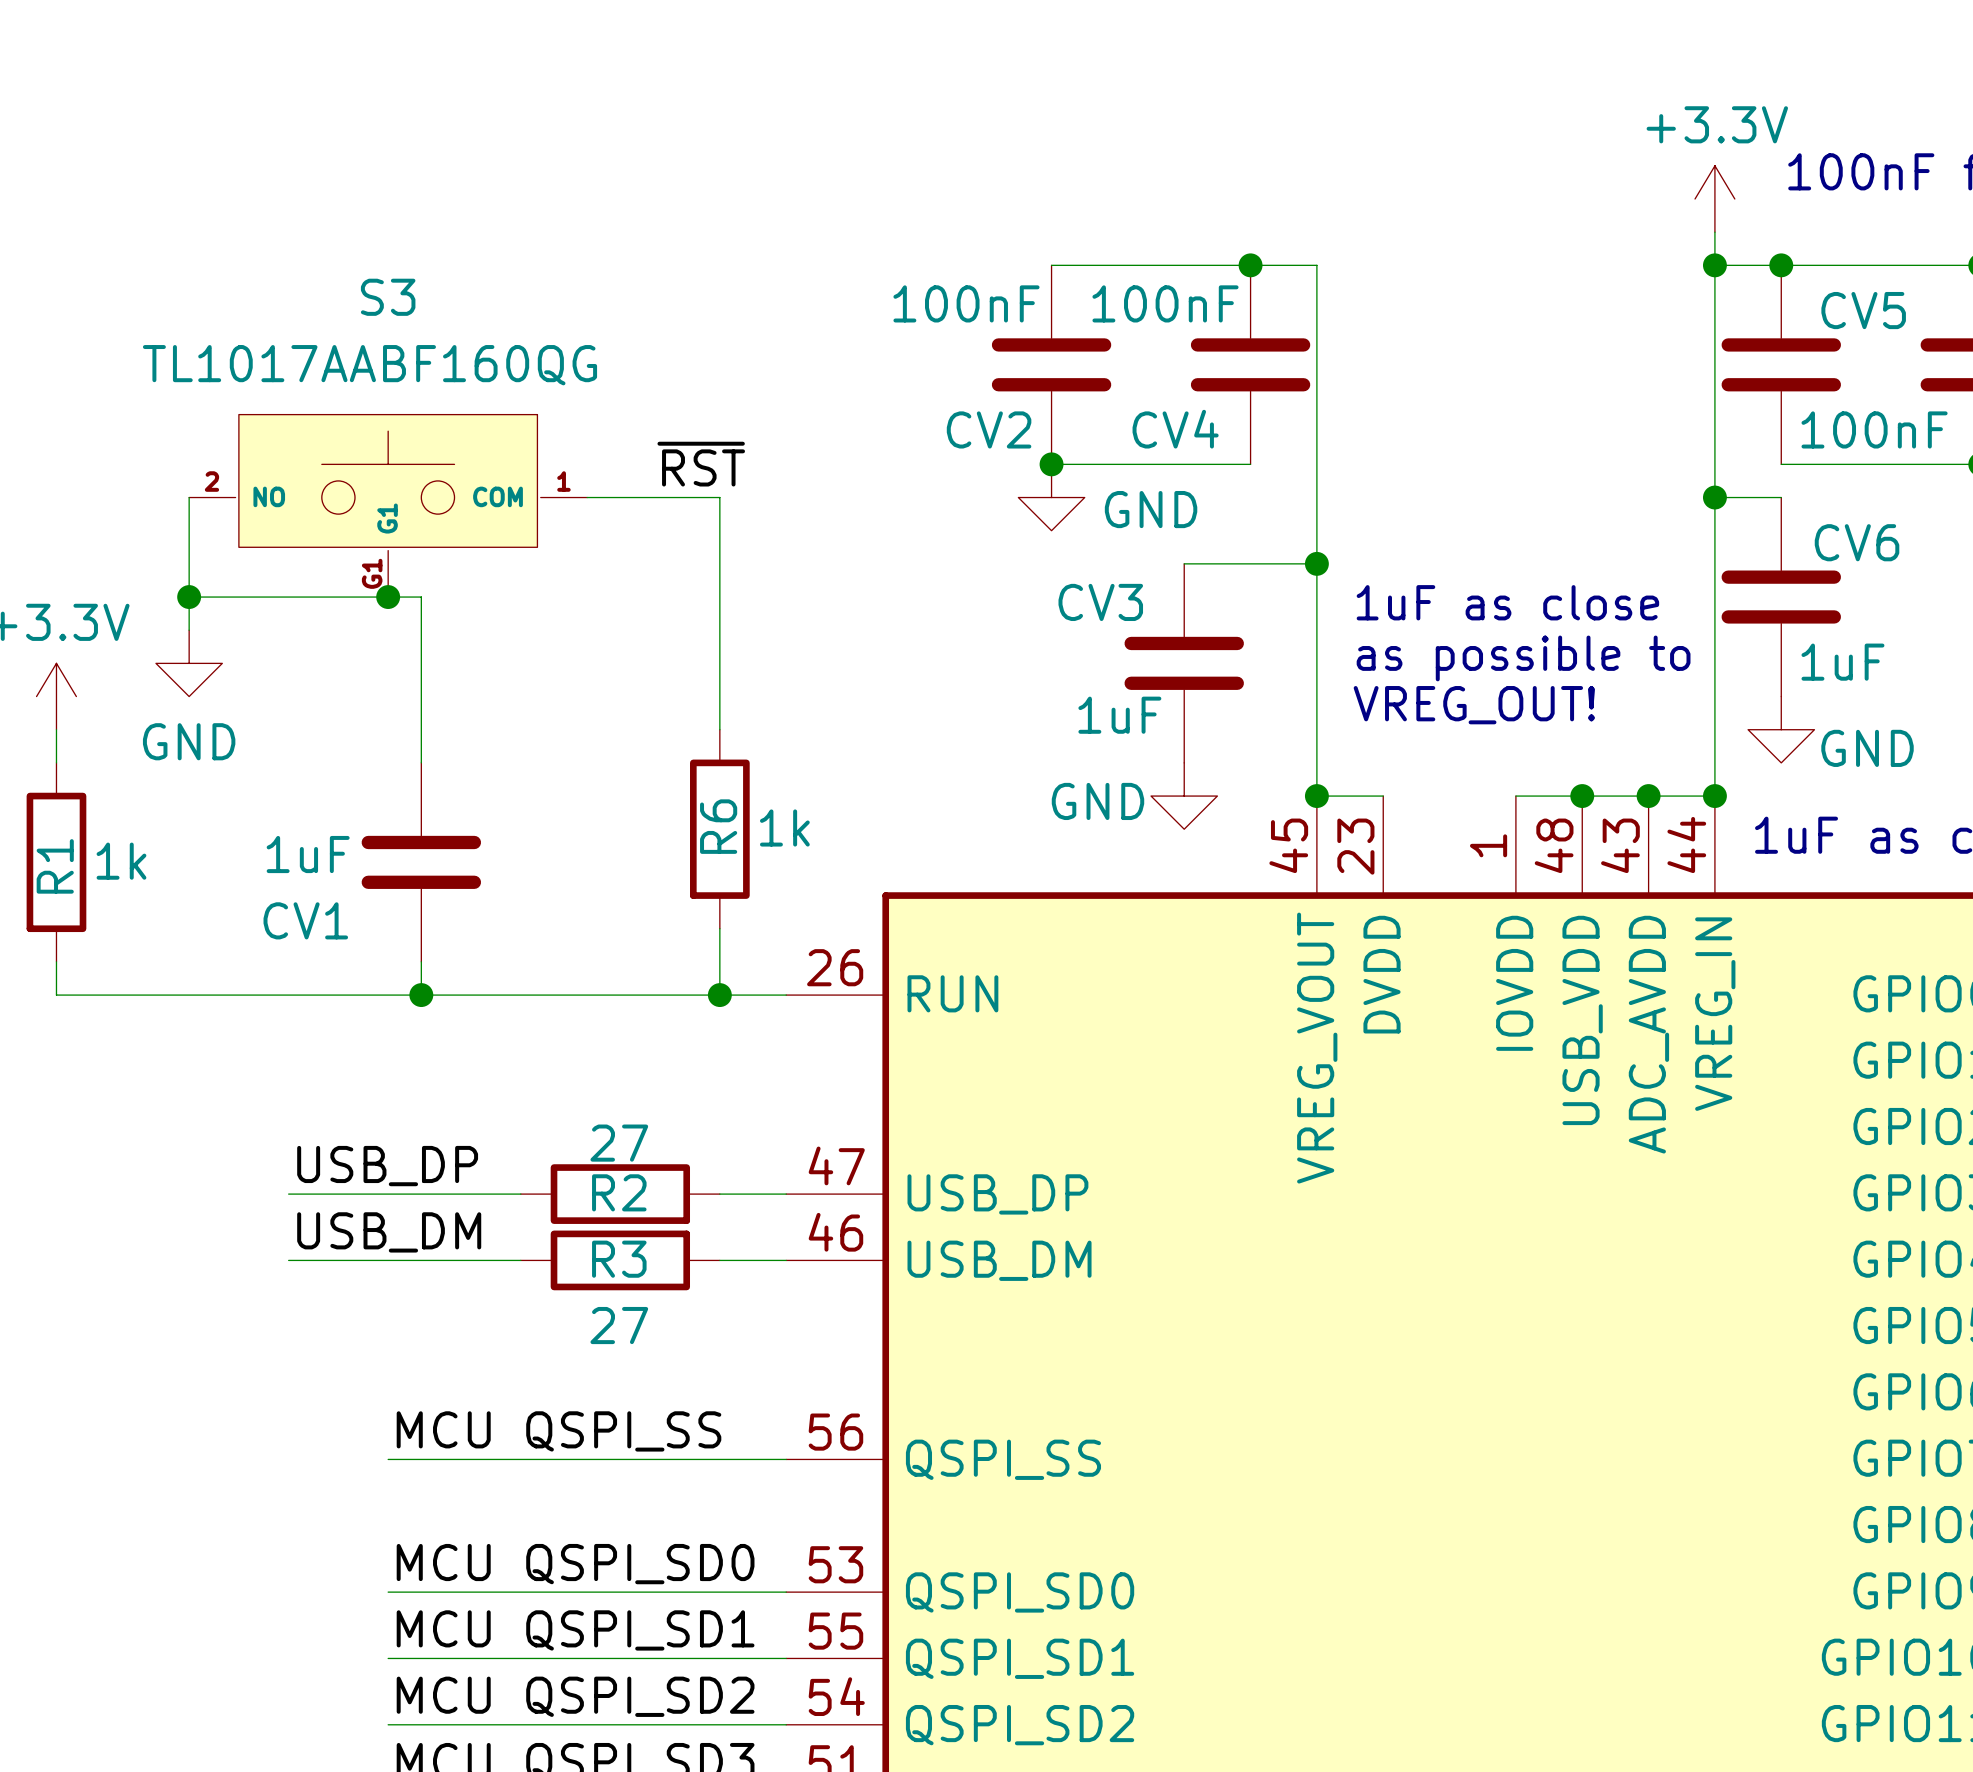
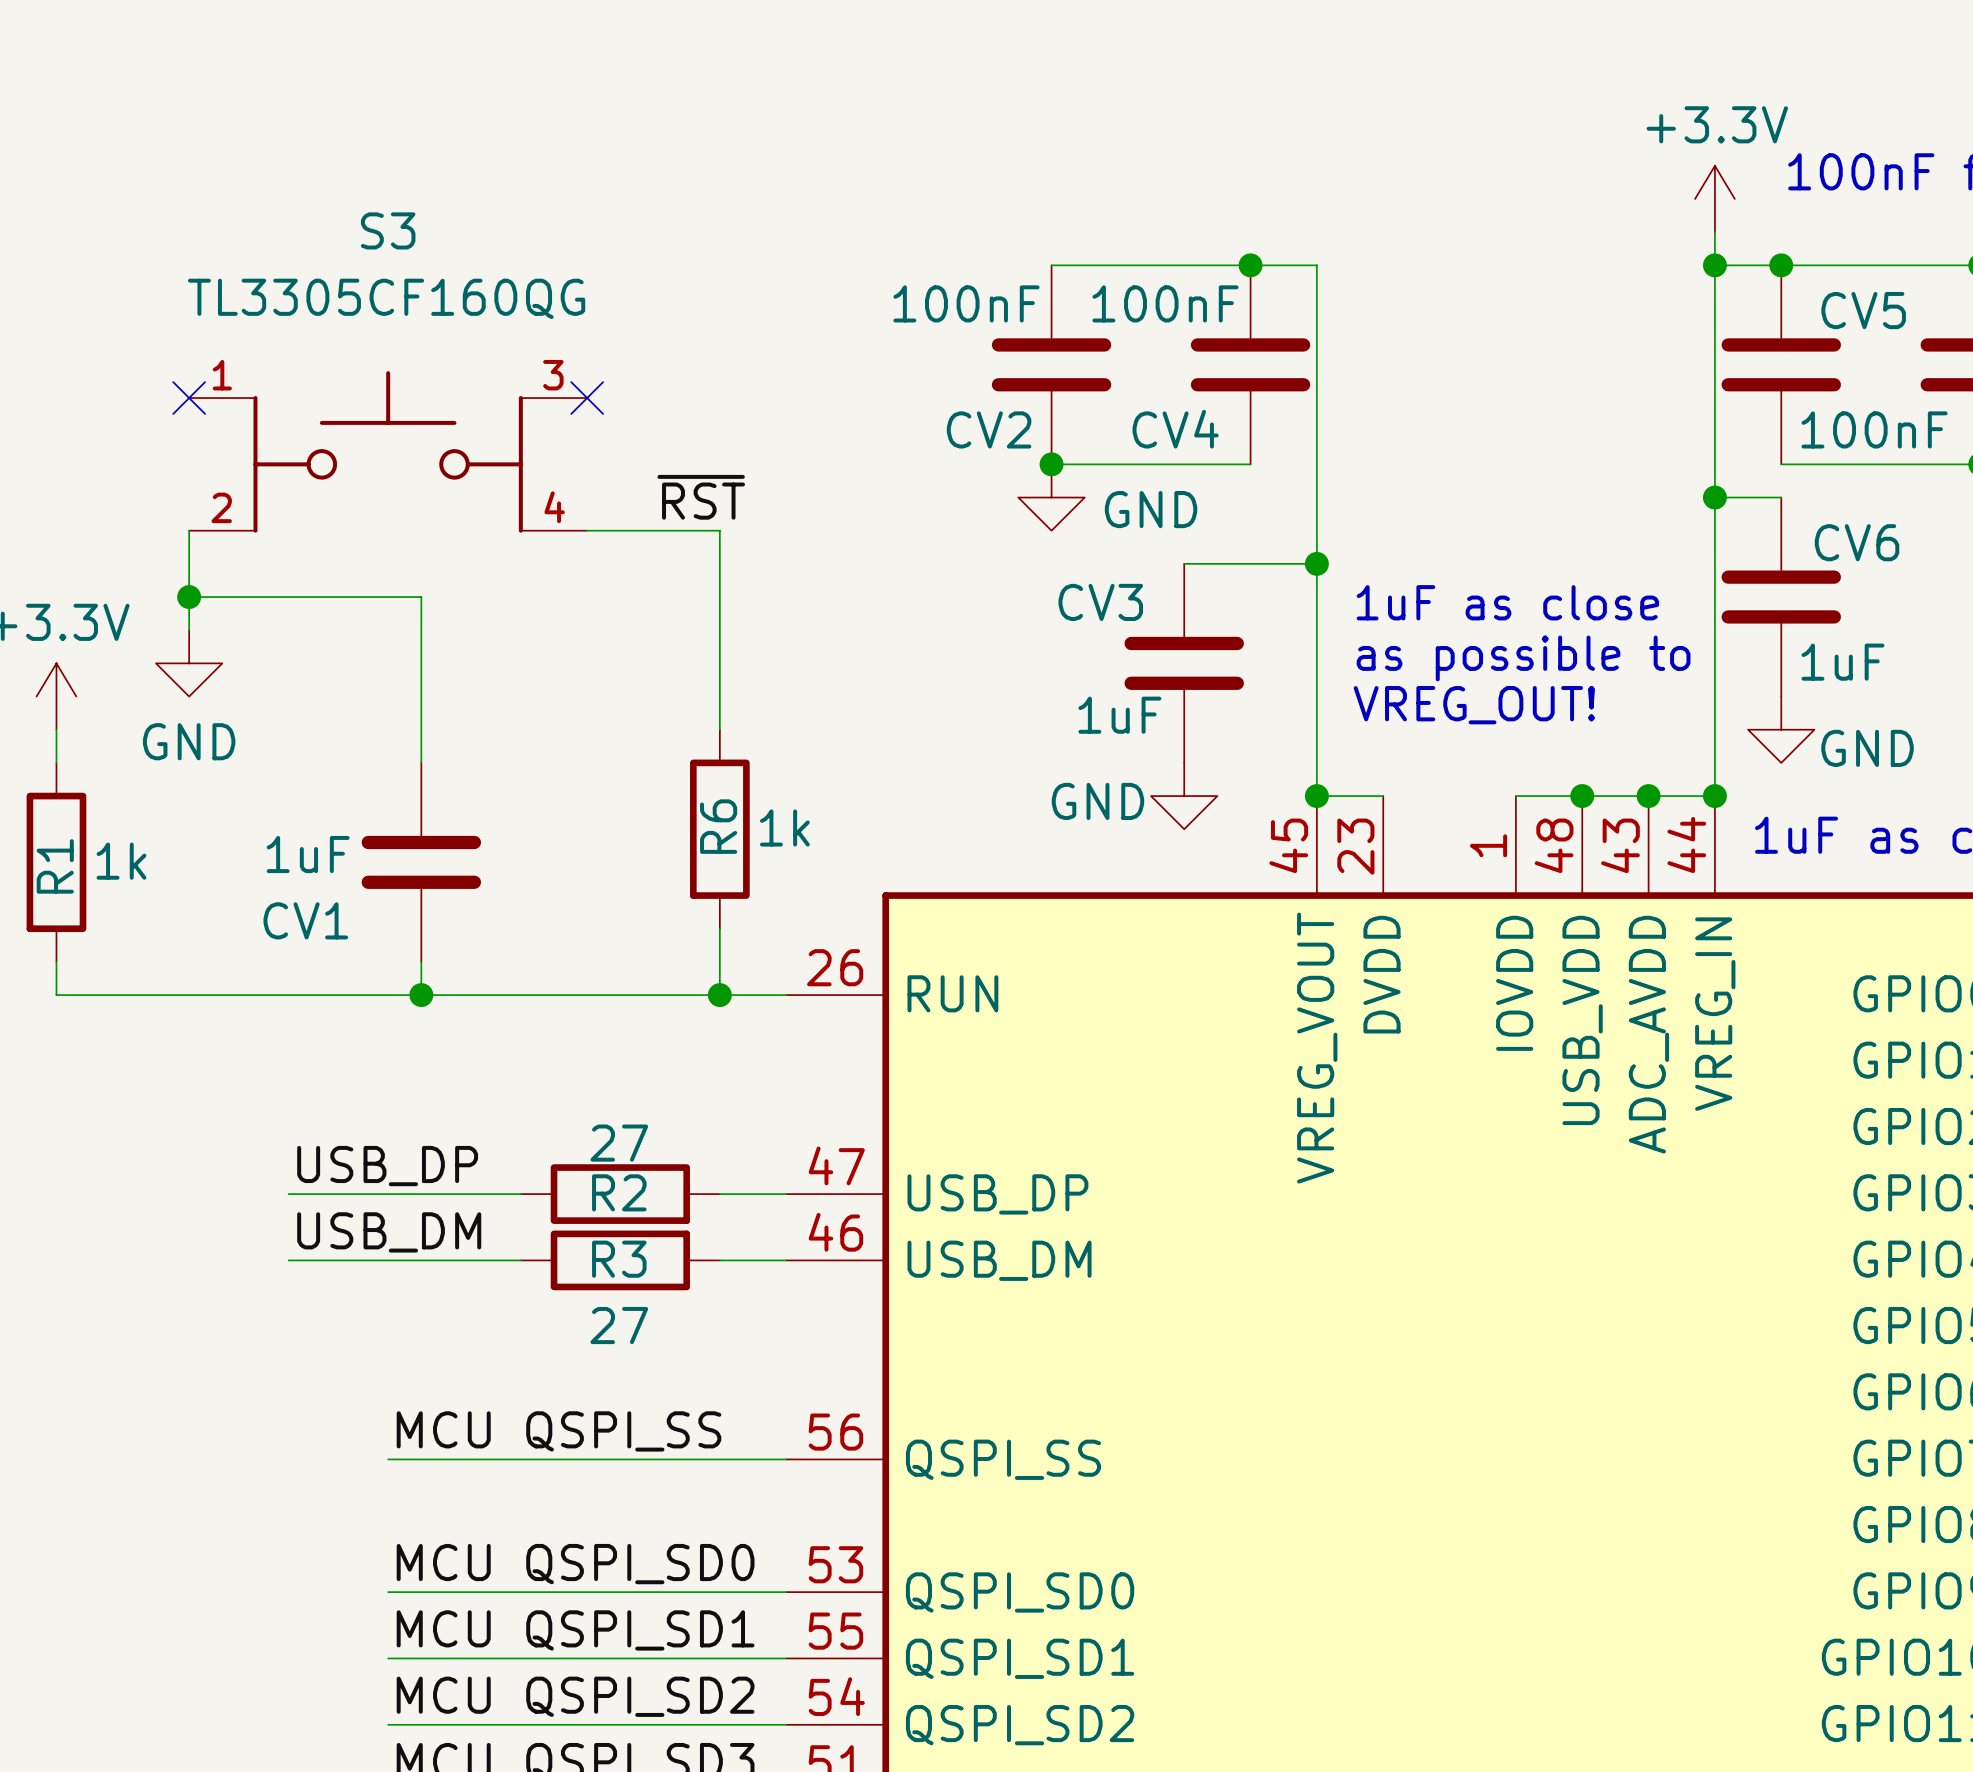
S3 value: TL1017AABF160QG (370, 365) -> TL3305CF160QG (386, 298)
no-connect mark: none -> (189, 398)
no-connect mark: none -> (587, 398)
S3 symbol: [189, 414, 588, 598] -> [189, 371, 588, 533]
label position: ~{RST} (701, 464) -> ~{RST} (701, 497)
wire: (189, 497) (189, 530) -> none
wire: (587, 497) (719, 497) (719, 530) -> (587, 530) (719, 530)
junction: (388, 597) -> none

